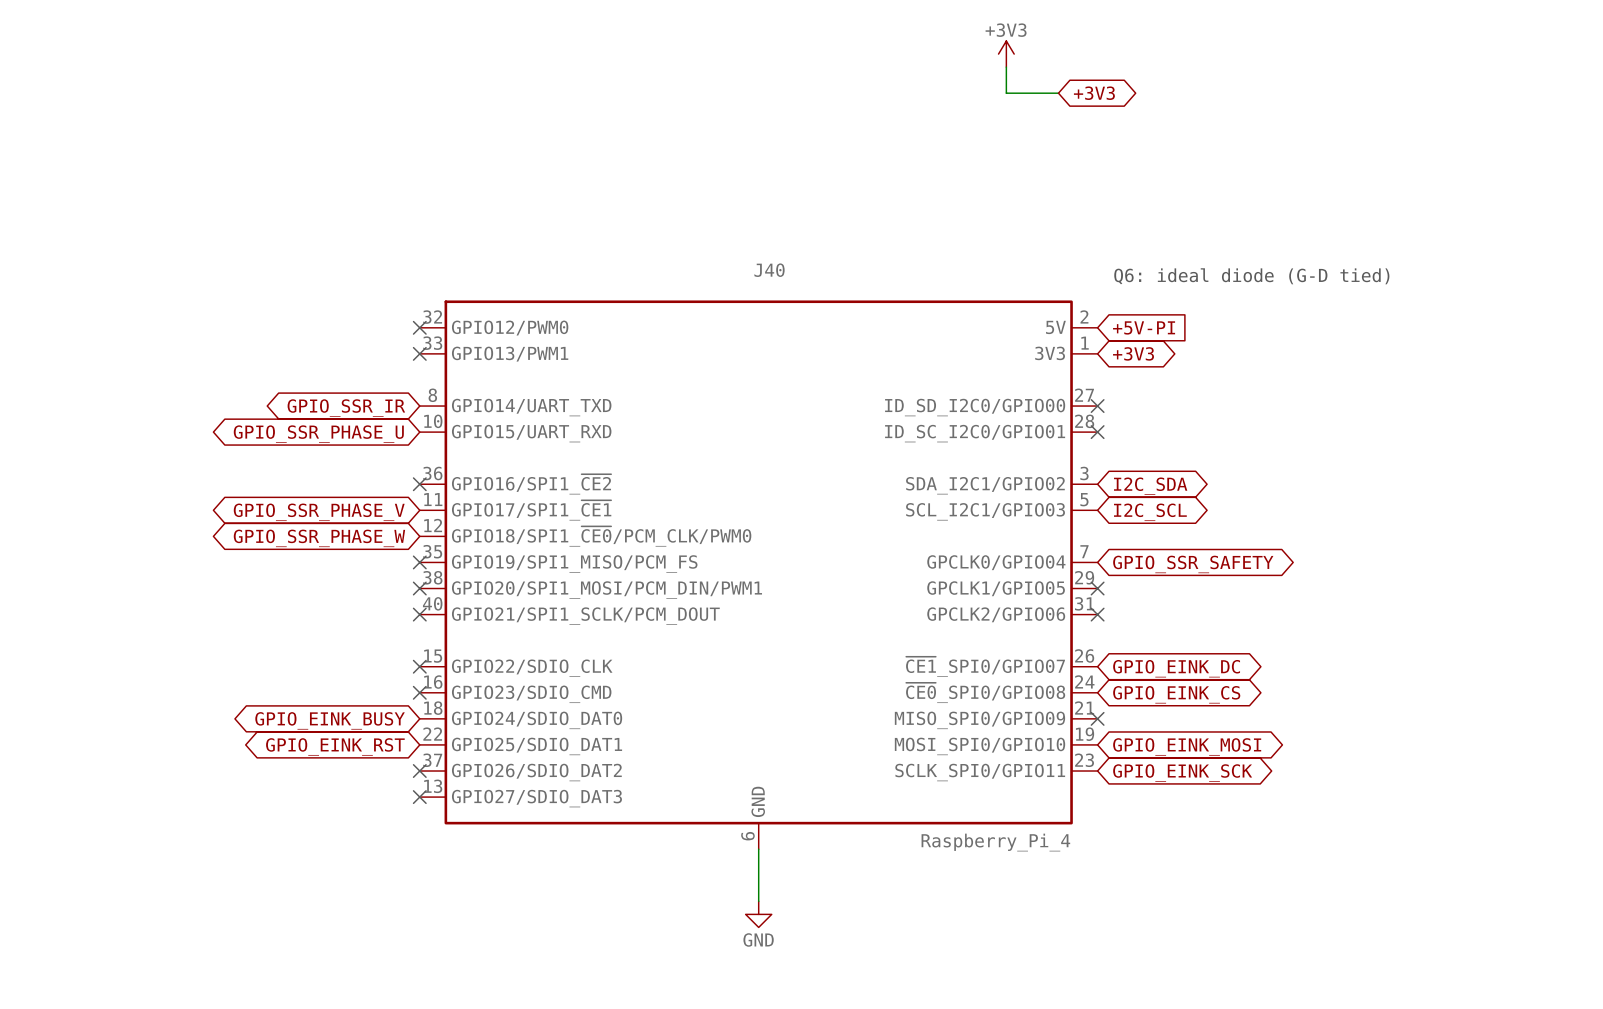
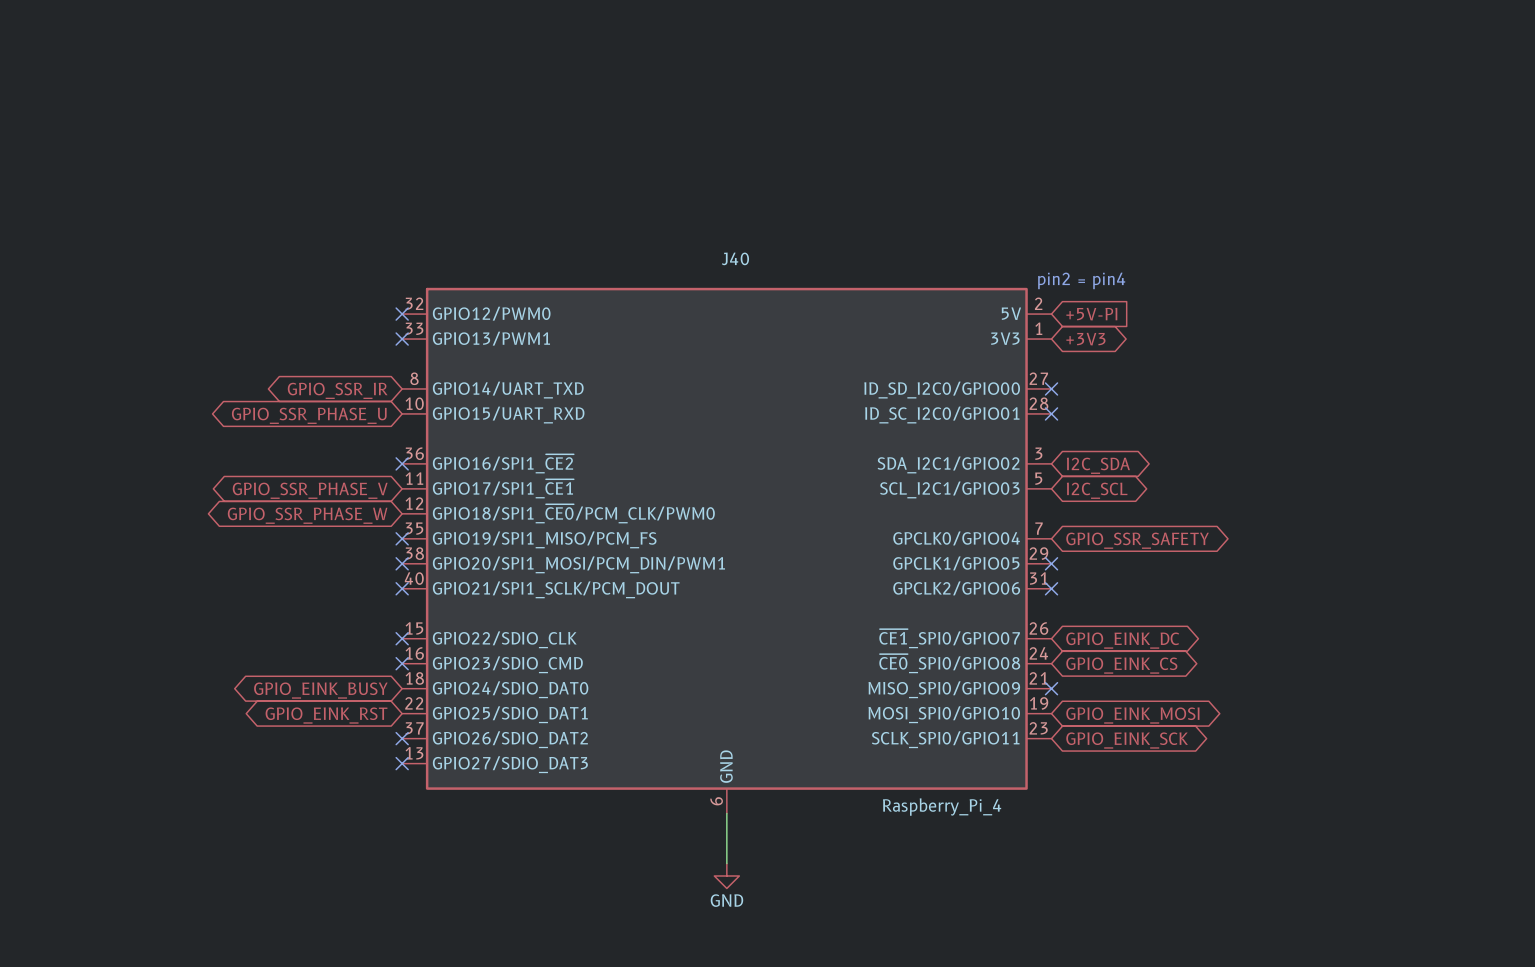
power symbol: +3V3 (1006, 54) -> none
wire: (1006, 67) (1006, 93) (1058, 93) -> none
global label: +3V3 (1094, 93) -> none
text: Q6: ideal diode (G-D tied) (1251, 276) -> none
text: none -> pin2 = pin4 (1081, 280)

